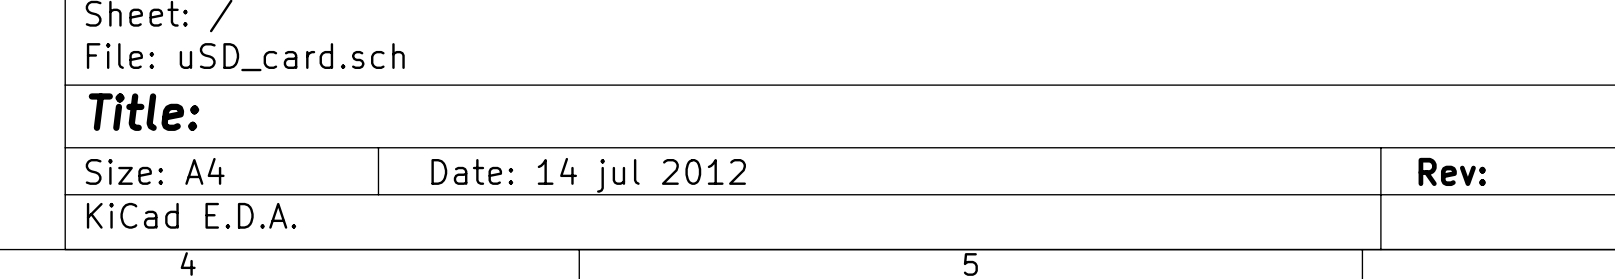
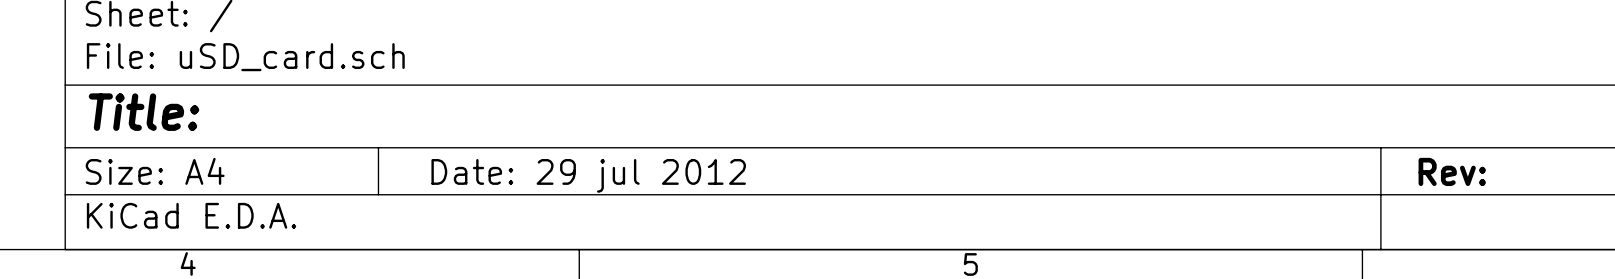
title block: Date: 14 jul 2012 (588, 175) -> Date: 29 jul 2012 (588, 175)

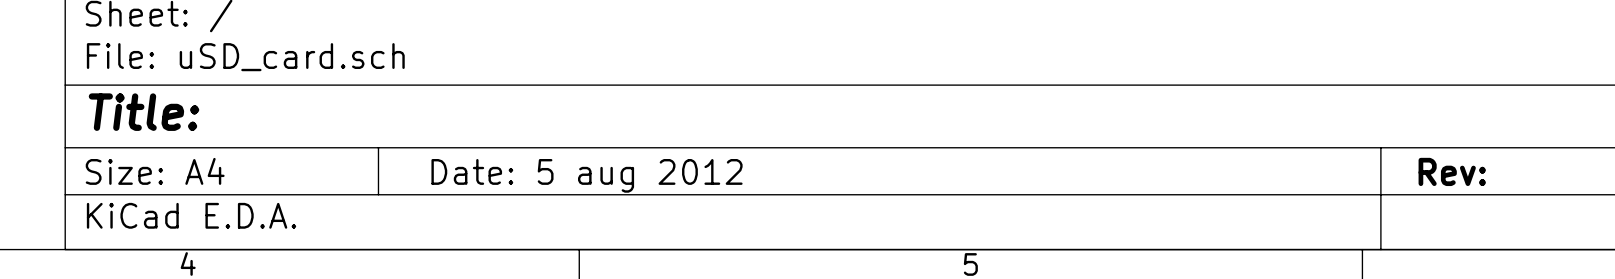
title block: Date: 29 jul 2012 (588, 175) -> Date: 5 aug 2012 (587, 175)

